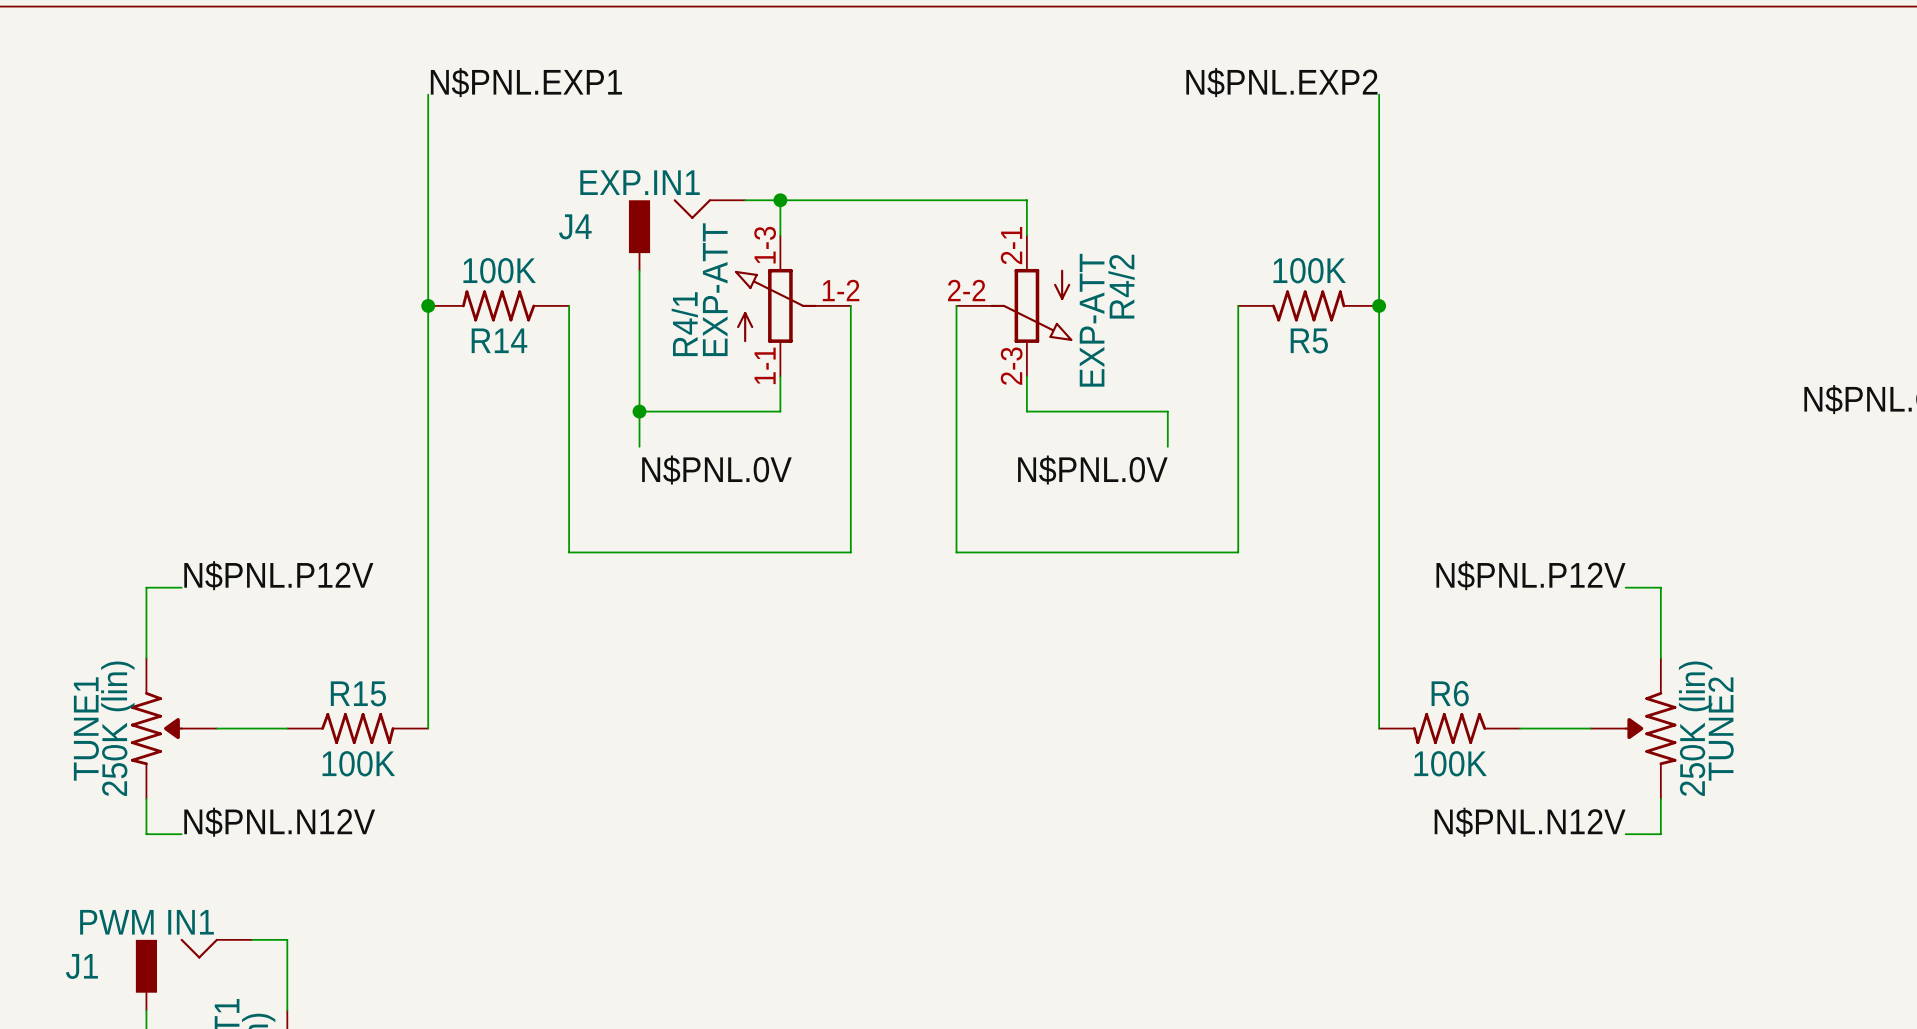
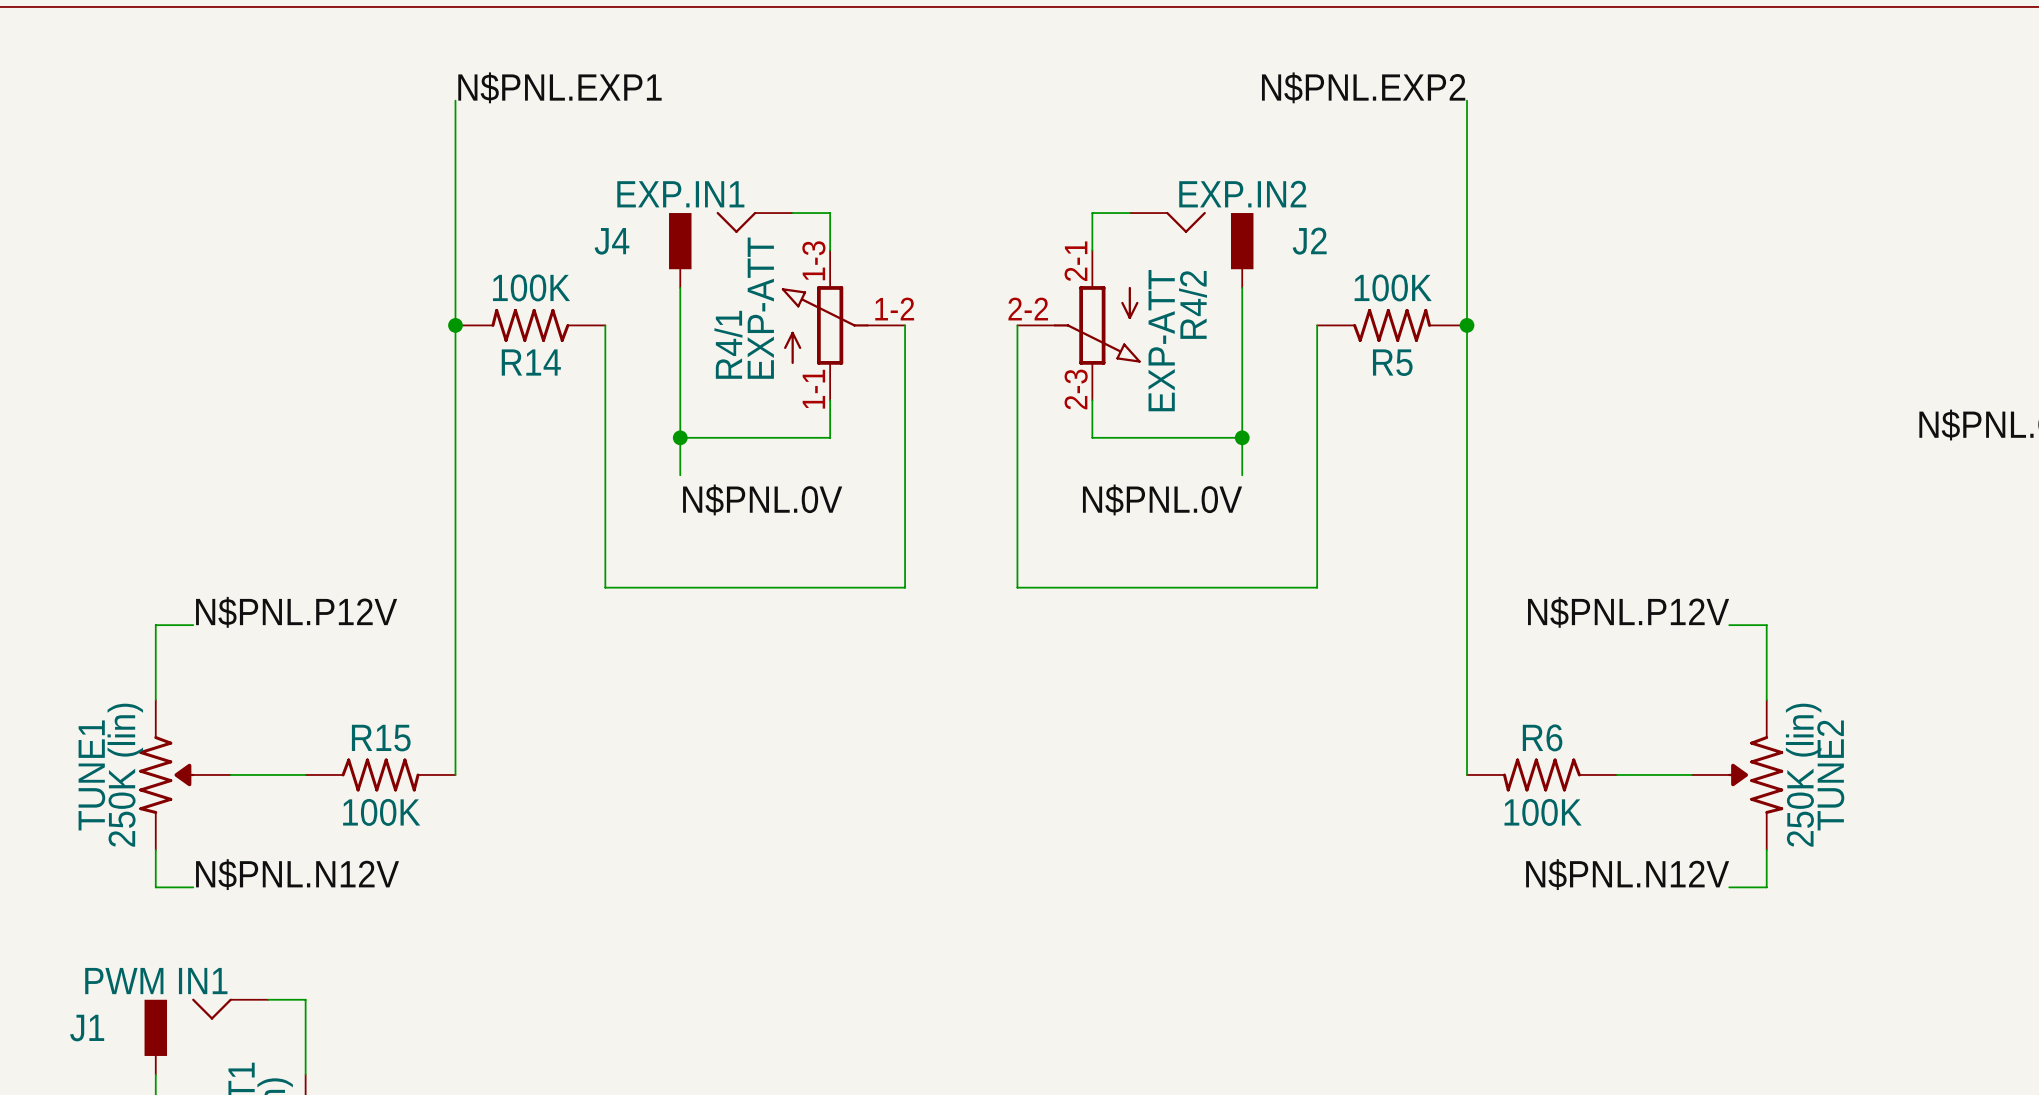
wire: (780, 200) (1026, 200) -> (1129, 213) (1092, 213)
junction: (780, 200) -> none
J2: none -> EXP.IN2 (1191, 249)
wire: none -> (1242, 287) (1242, 437)
junction: none -> (1242, 437)

